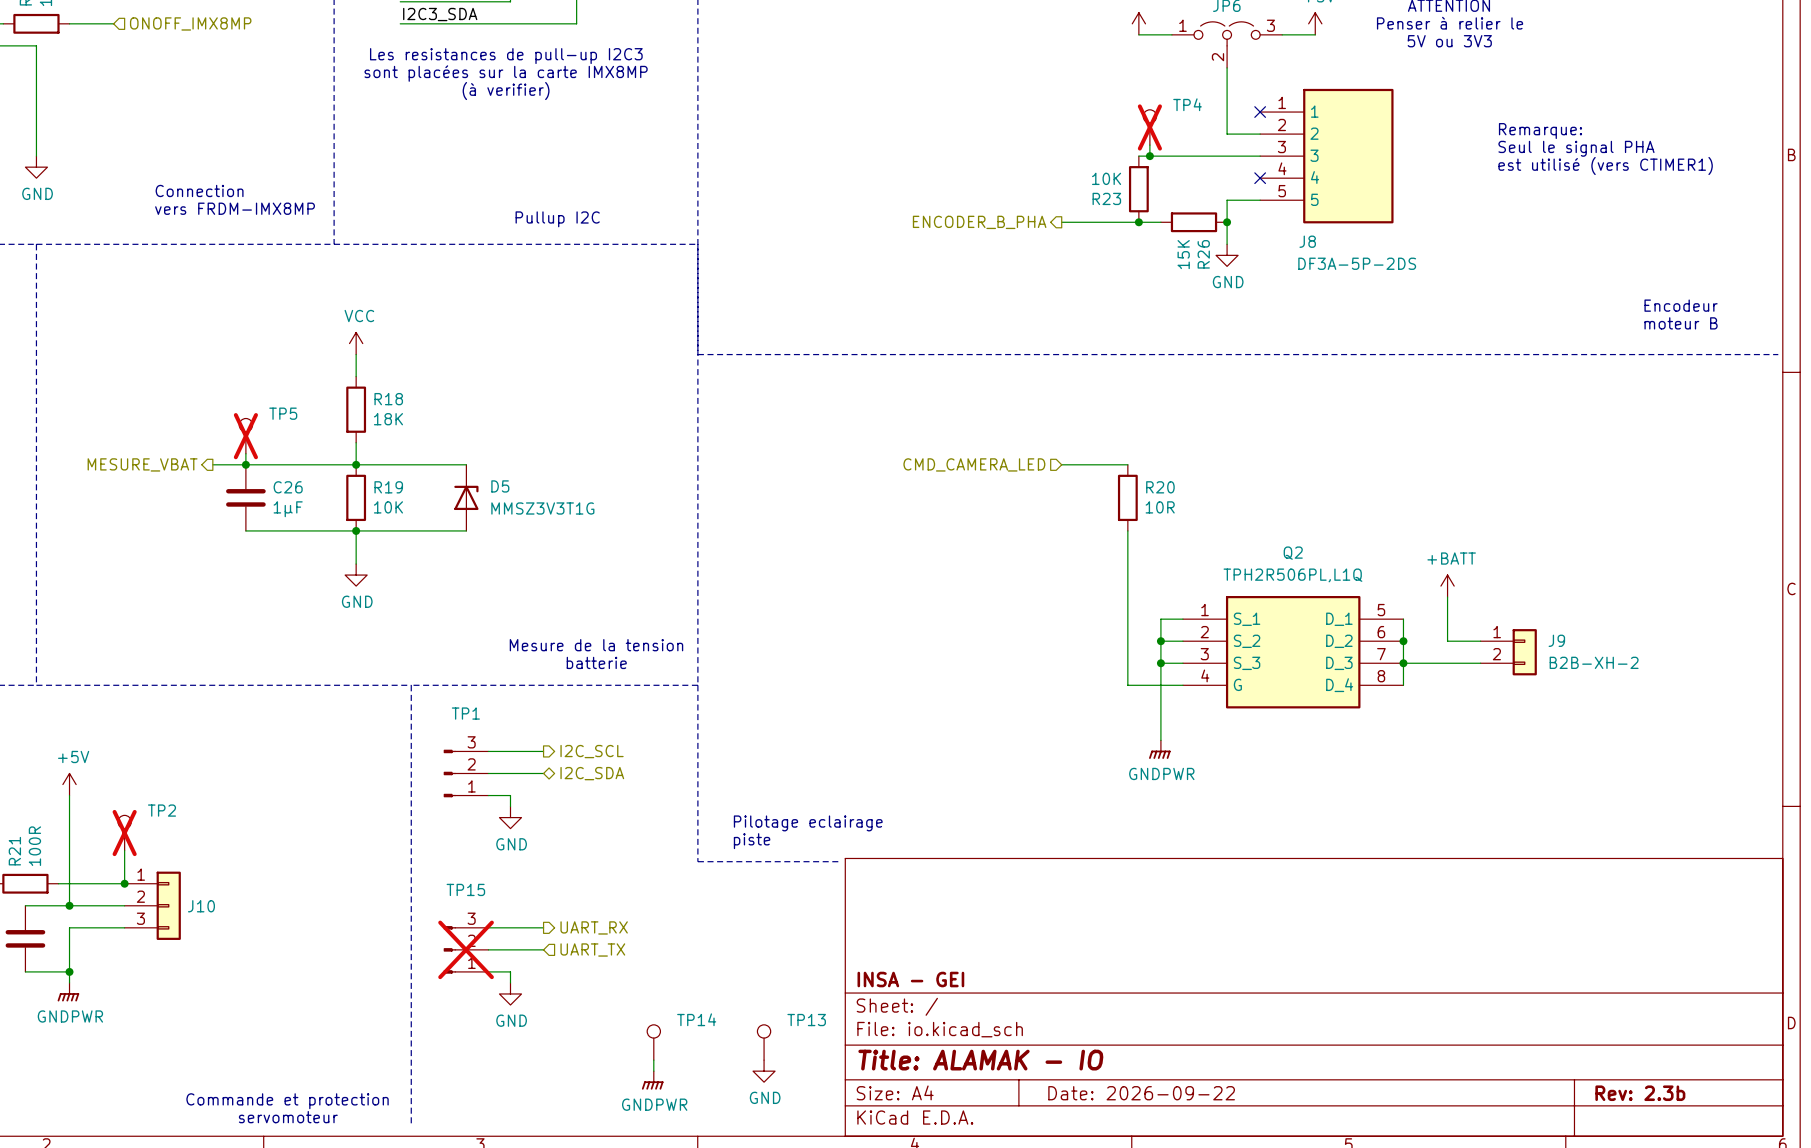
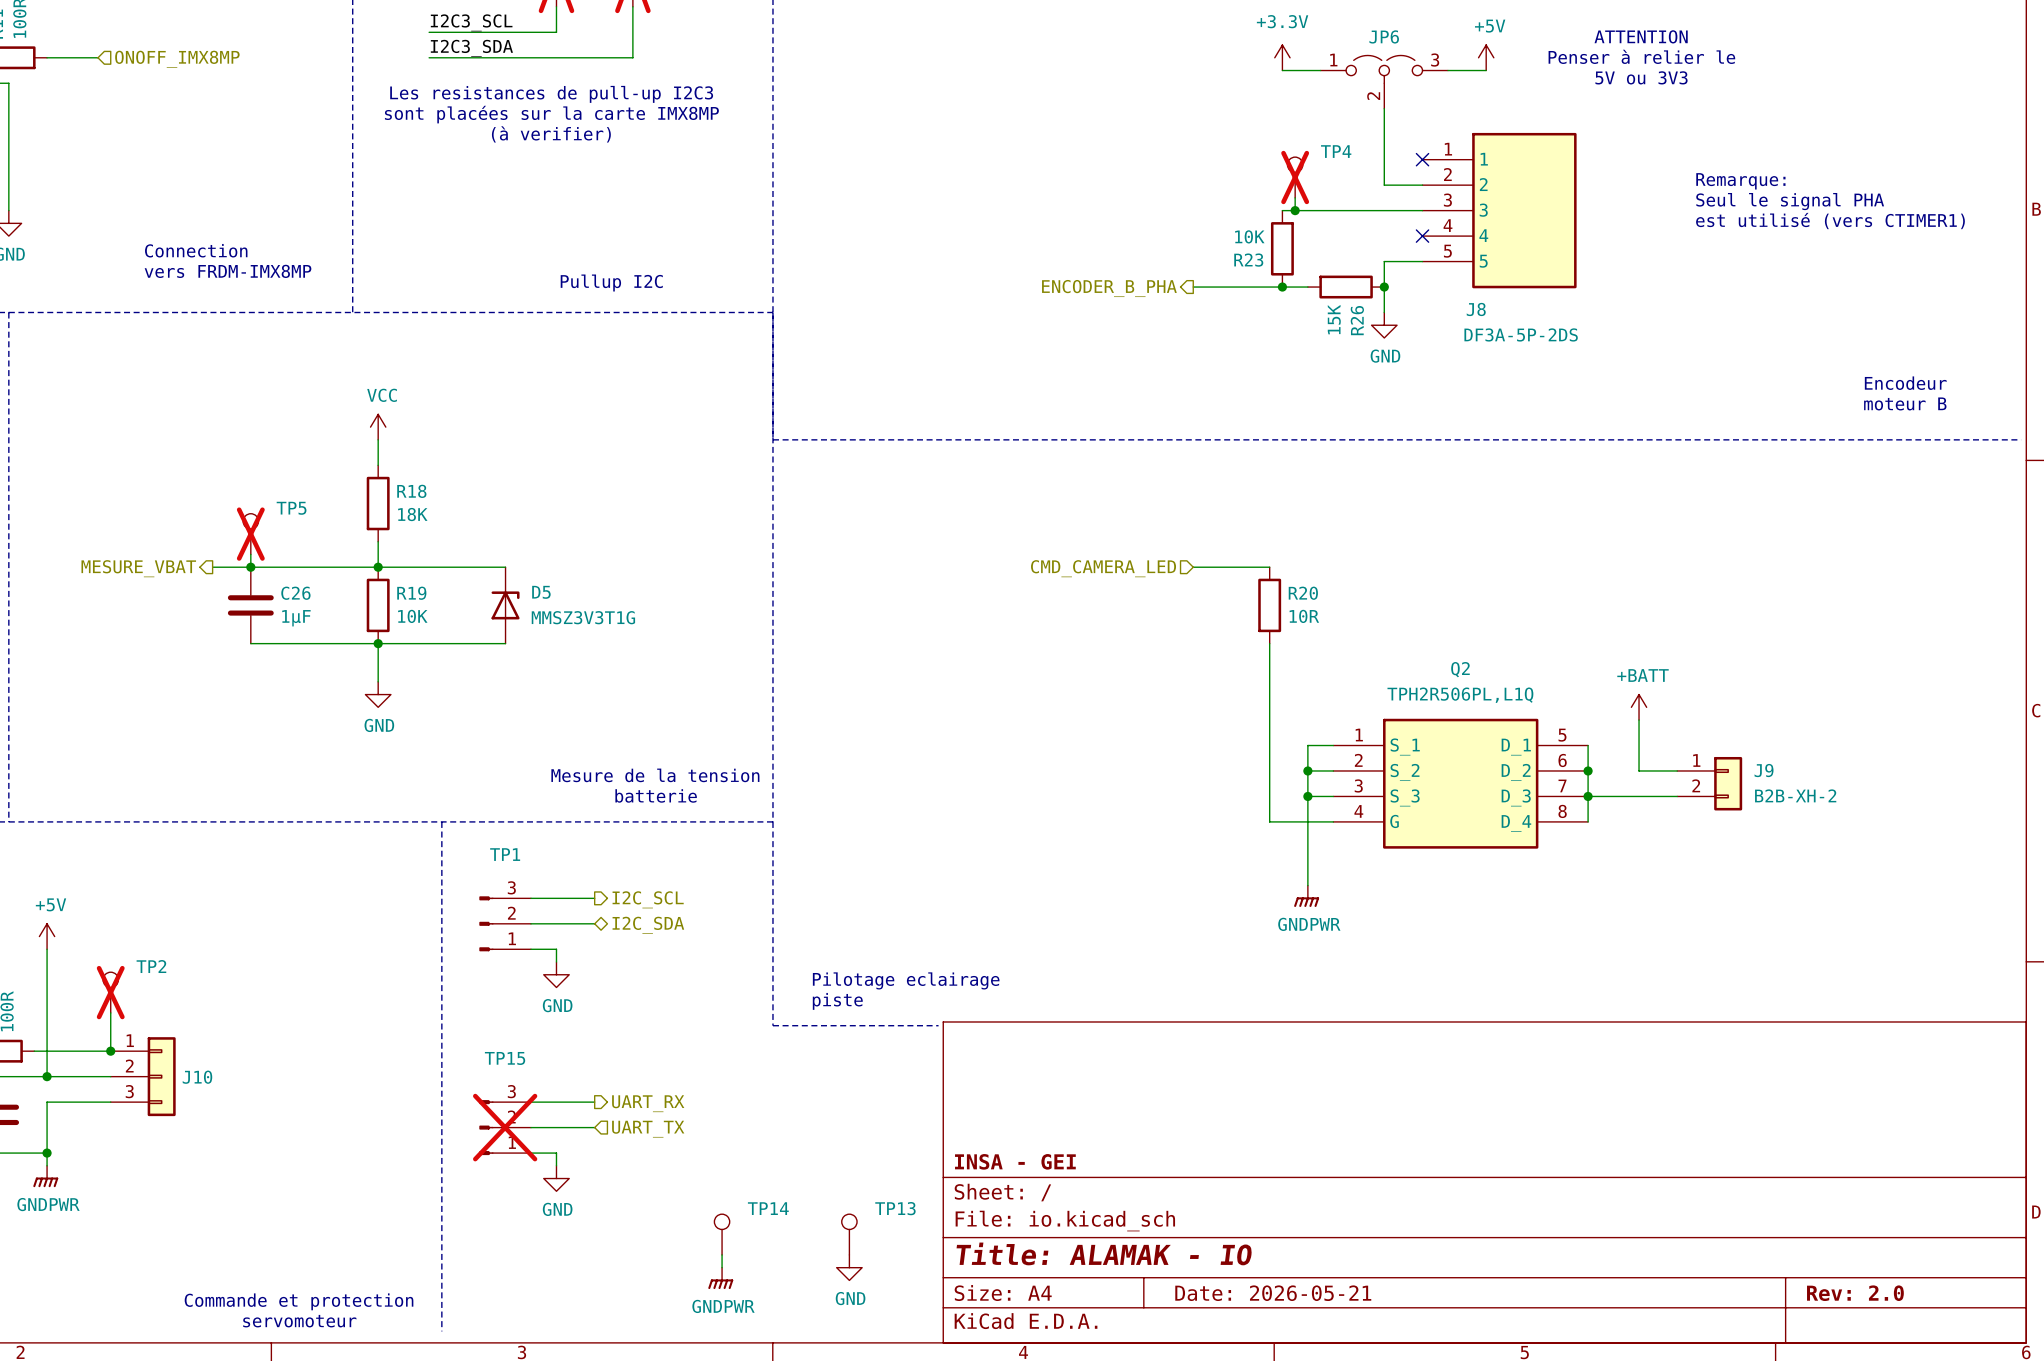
title block: Date: 2026-09-22 (1141, 1093) -> Date: 2026-05-21 (1273, 1293)
title block: Rev: 2.3b (1640, 1093) -> Rev: 2.0 (1855, 1293)

